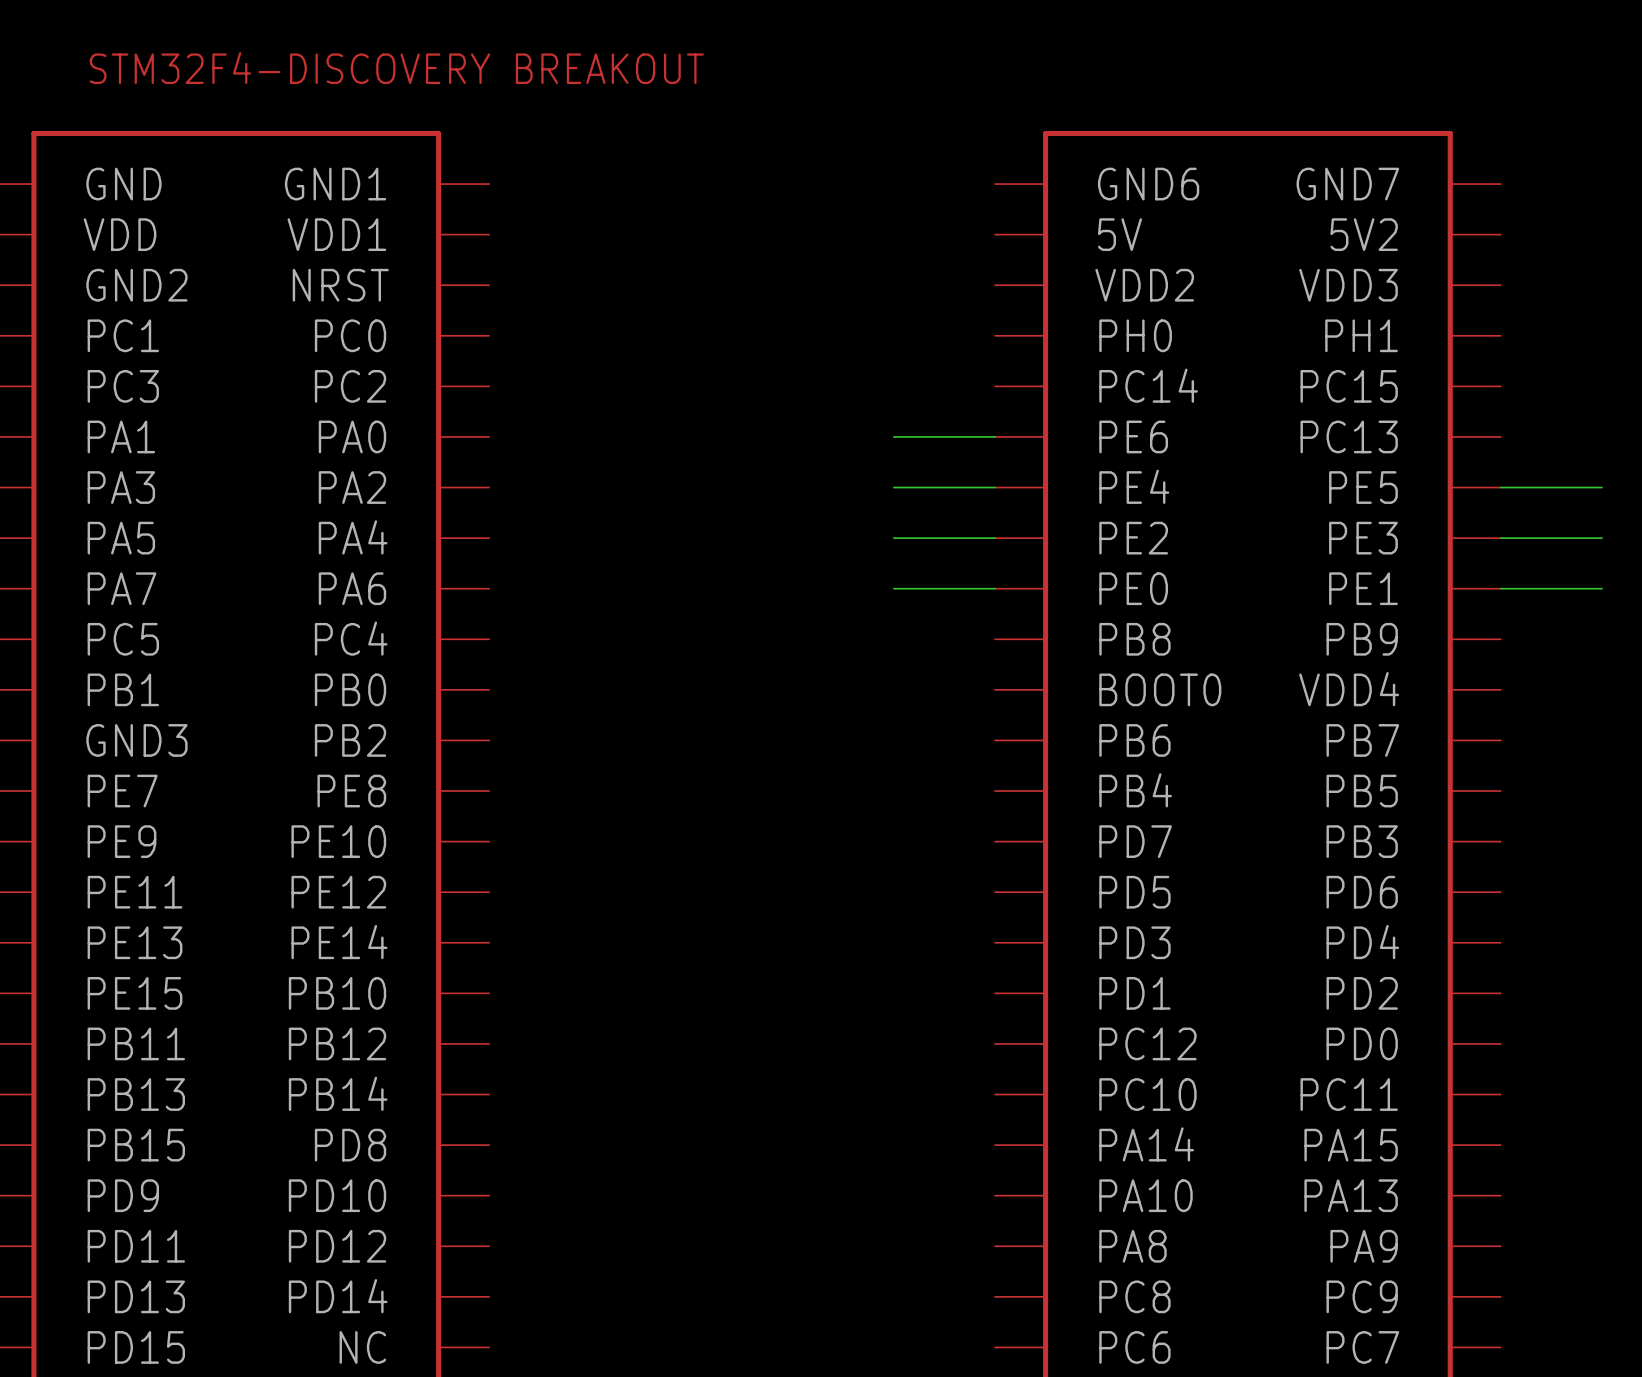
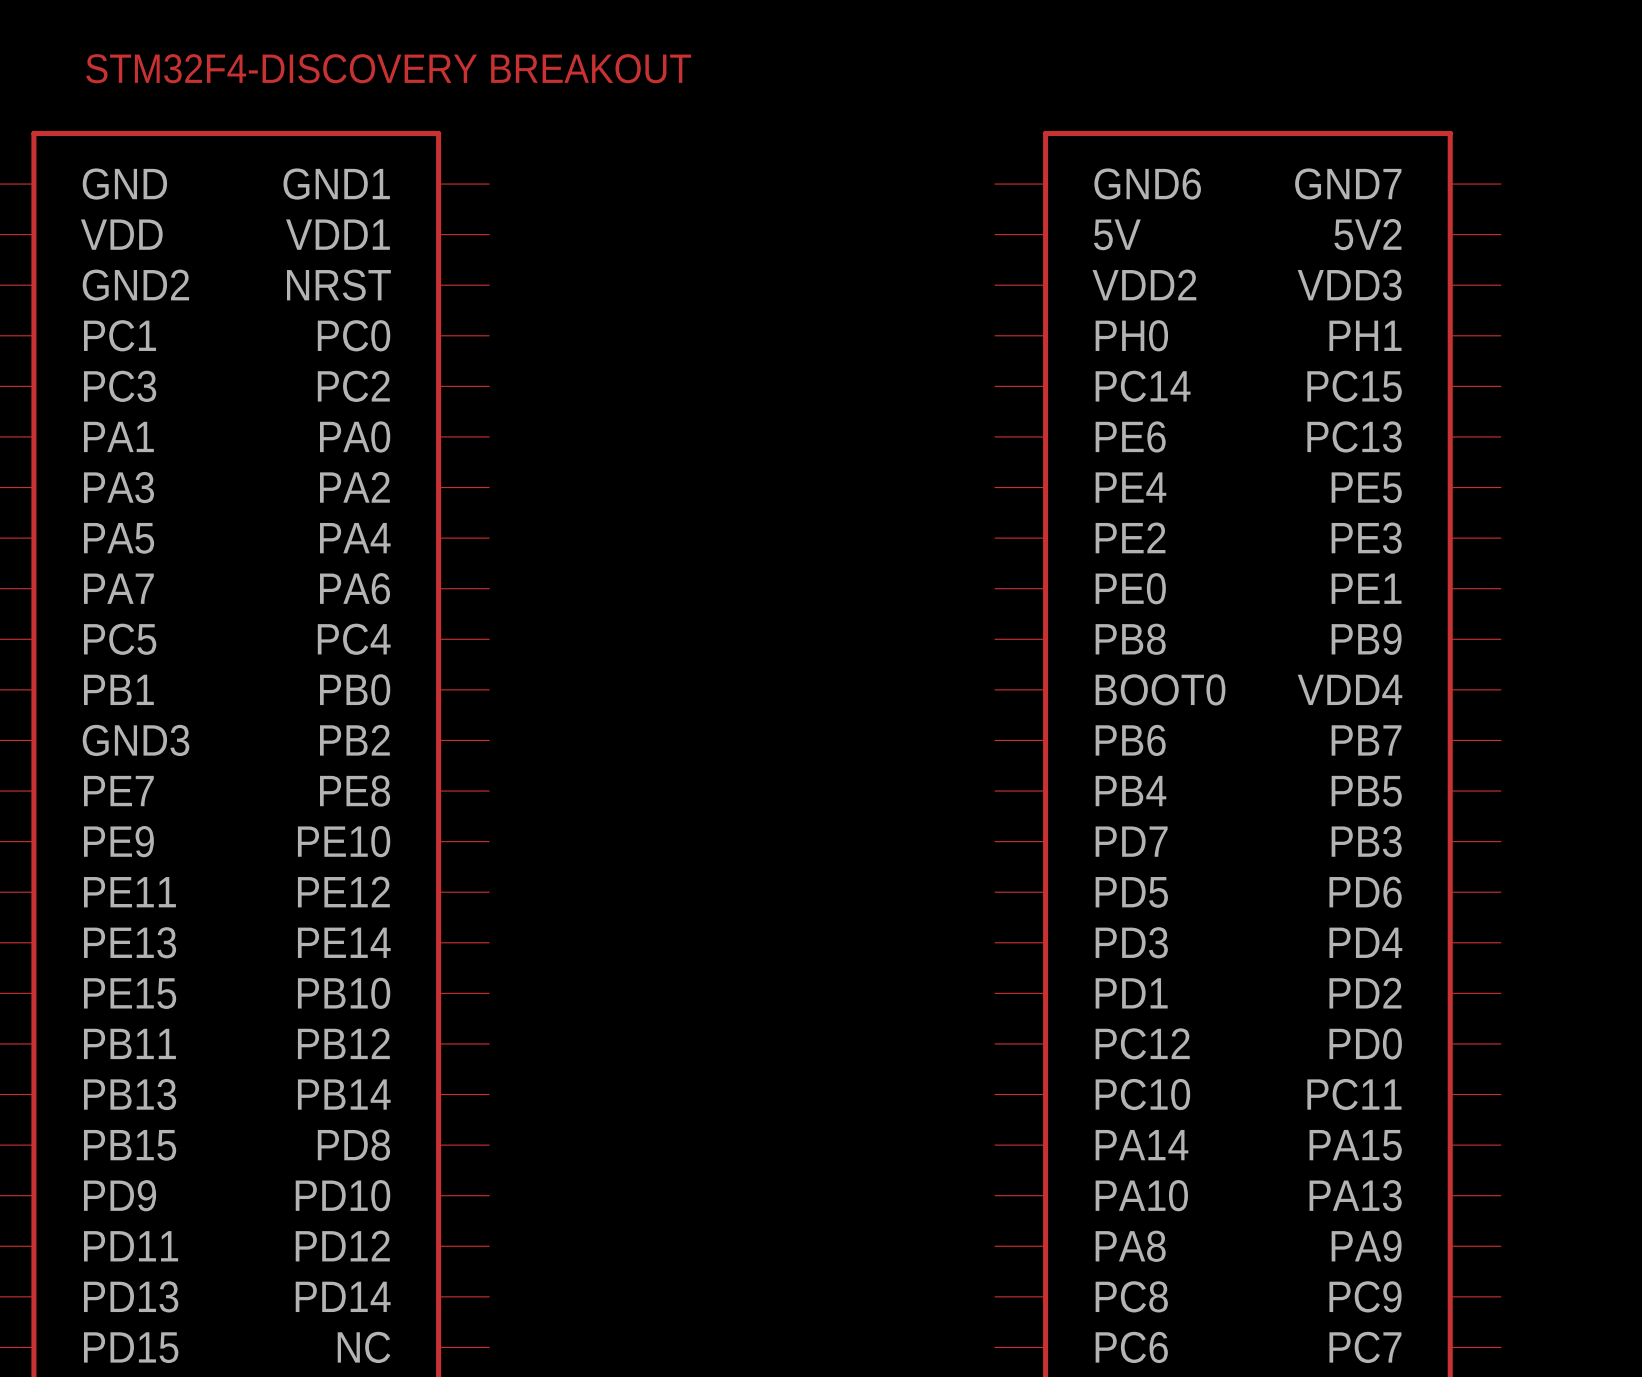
wire: (893, 436) (995, 436) -> none
wire: (893, 487) (995, 487) -> none
wire: (1500, 487) (1601, 487) -> none
wire: (893, 538) (995, 538) -> none
wire: (1500, 538) (1601, 538) -> none
wire: (893, 588) (995, 588) -> none
wire: (1500, 588) (1601, 588) -> none

